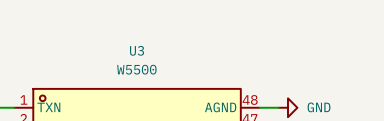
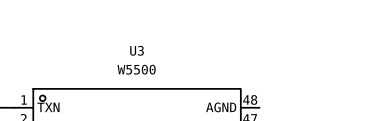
wire: (259, 107) (278, 107) -> none
power symbol: GND (287, 107) -> none

